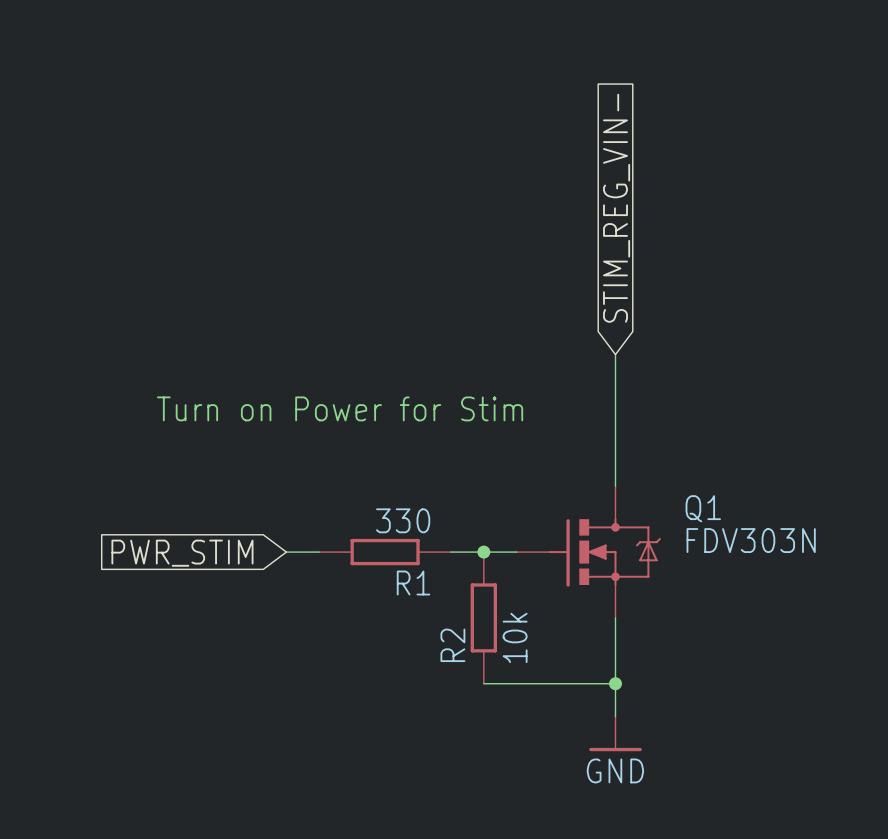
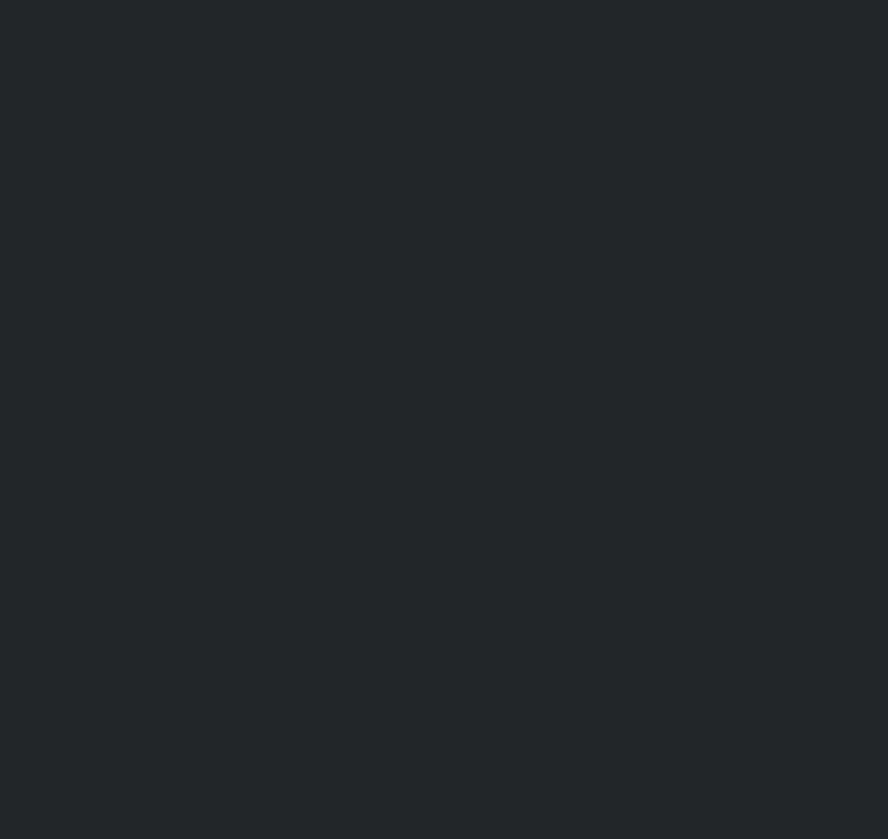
global label: STIM_REG_VIN- (616, 208) -> none
wire: (615, 354) (615, 486) -> none
text: Turn on Power for Stim (340, 408) -> none
wire: (286, 552) (319, 552) -> none
R1: 330 (385, 552) -> none
wire: (450, 552) (516, 552) -> none
junction: (483, 552) -> none
Q1: FDV303N (588, 552) -> none
global label: PWR_STIM (182, 553) -> none
R2: 10k (483, 617) -> none
wire: (615, 617) (615, 716) -> none
wire: (483, 683) (615, 683) -> none
junction: (615, 683) -> none
power symbol: GND (615, 733) -> none

